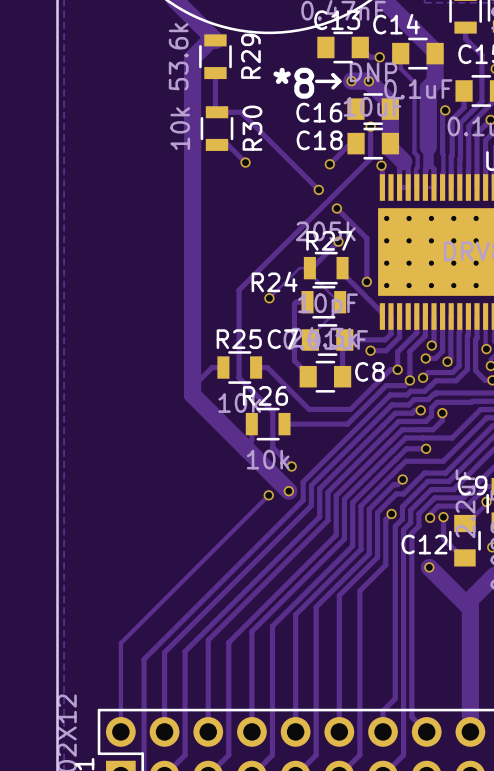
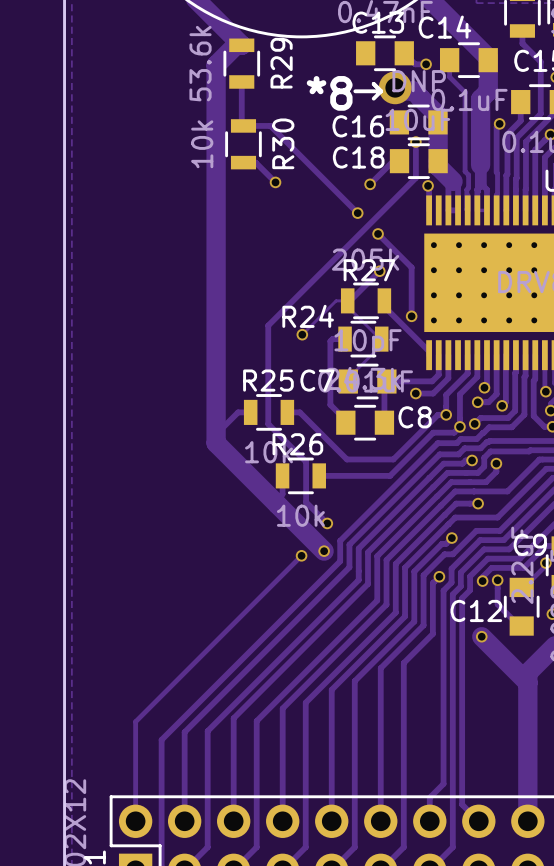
via size: [346, 75, 357, 87] -> [378, 71, 412, 105]
via: (368, 81) -> none

